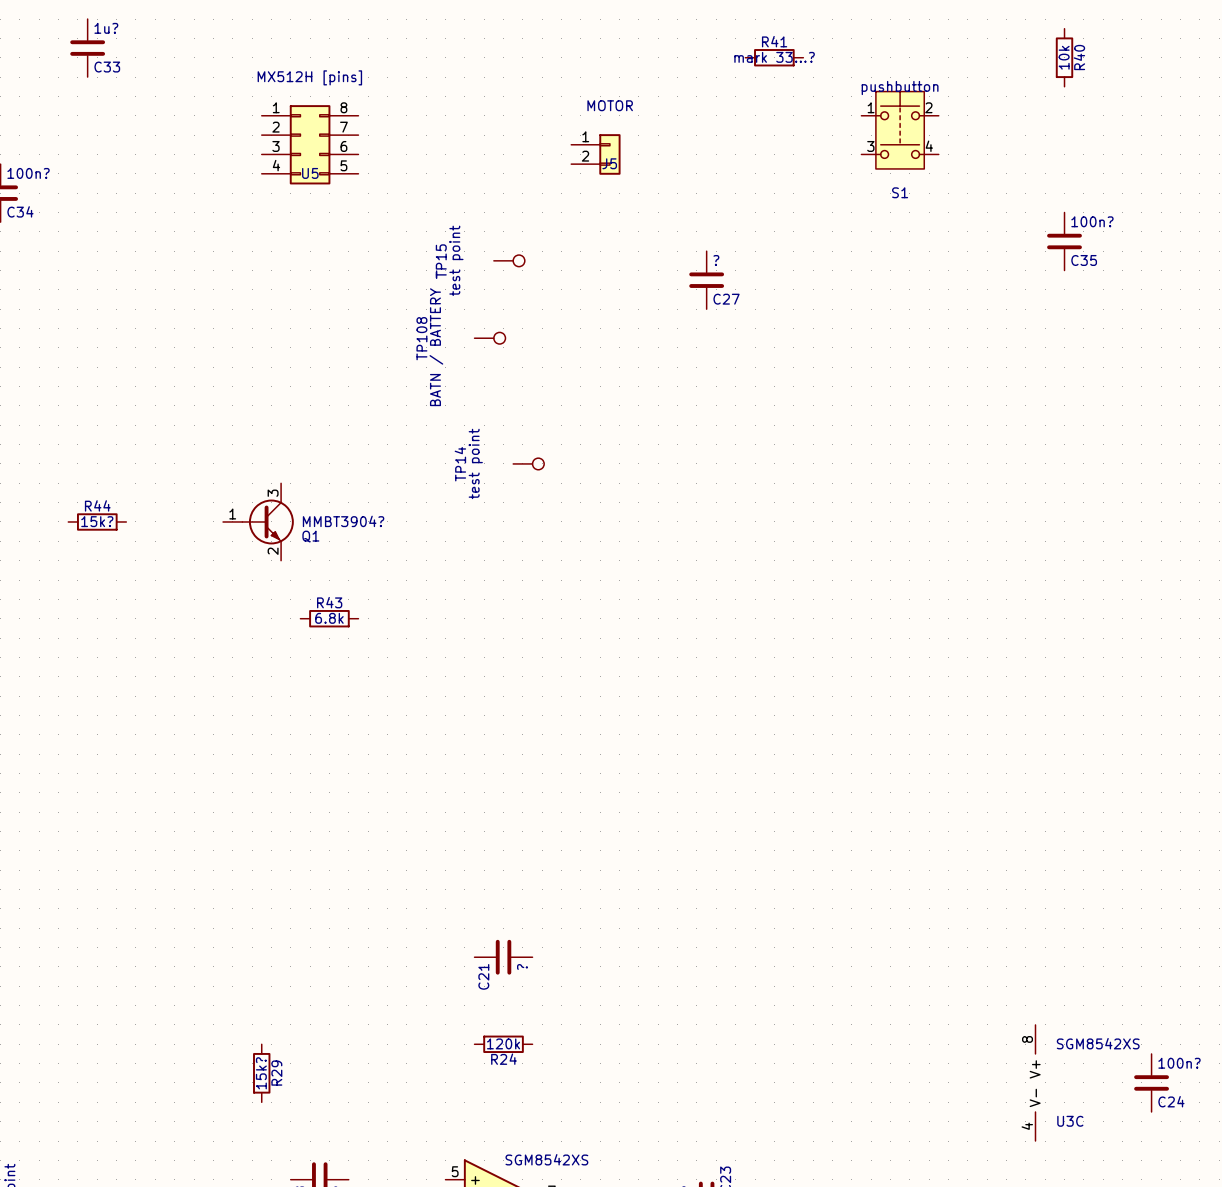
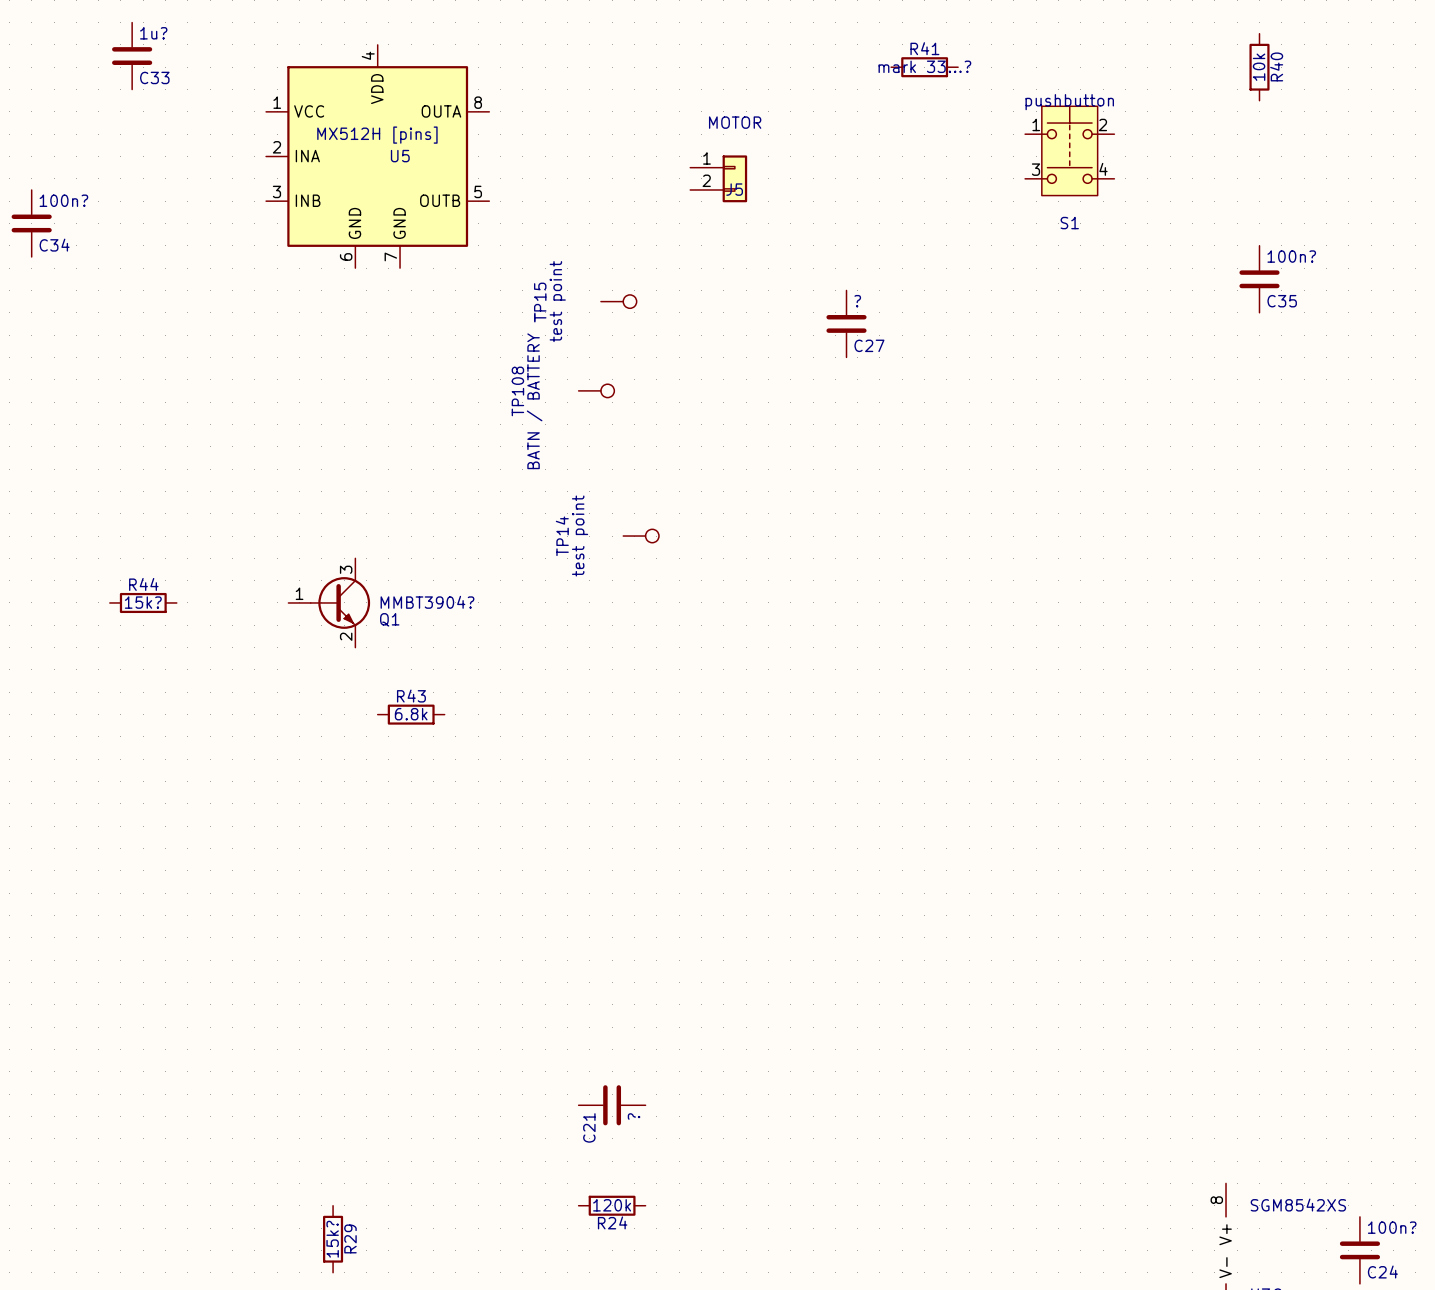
U5 value position: MX512H [pins] (309, 77) -> MX512H [pins] (377, 135)
U5 symbol: [261, 105, 359, 185] -> [266, 44, 490, 269]
U5 name position: U5 (310, 173) -> U5 (400, 156)

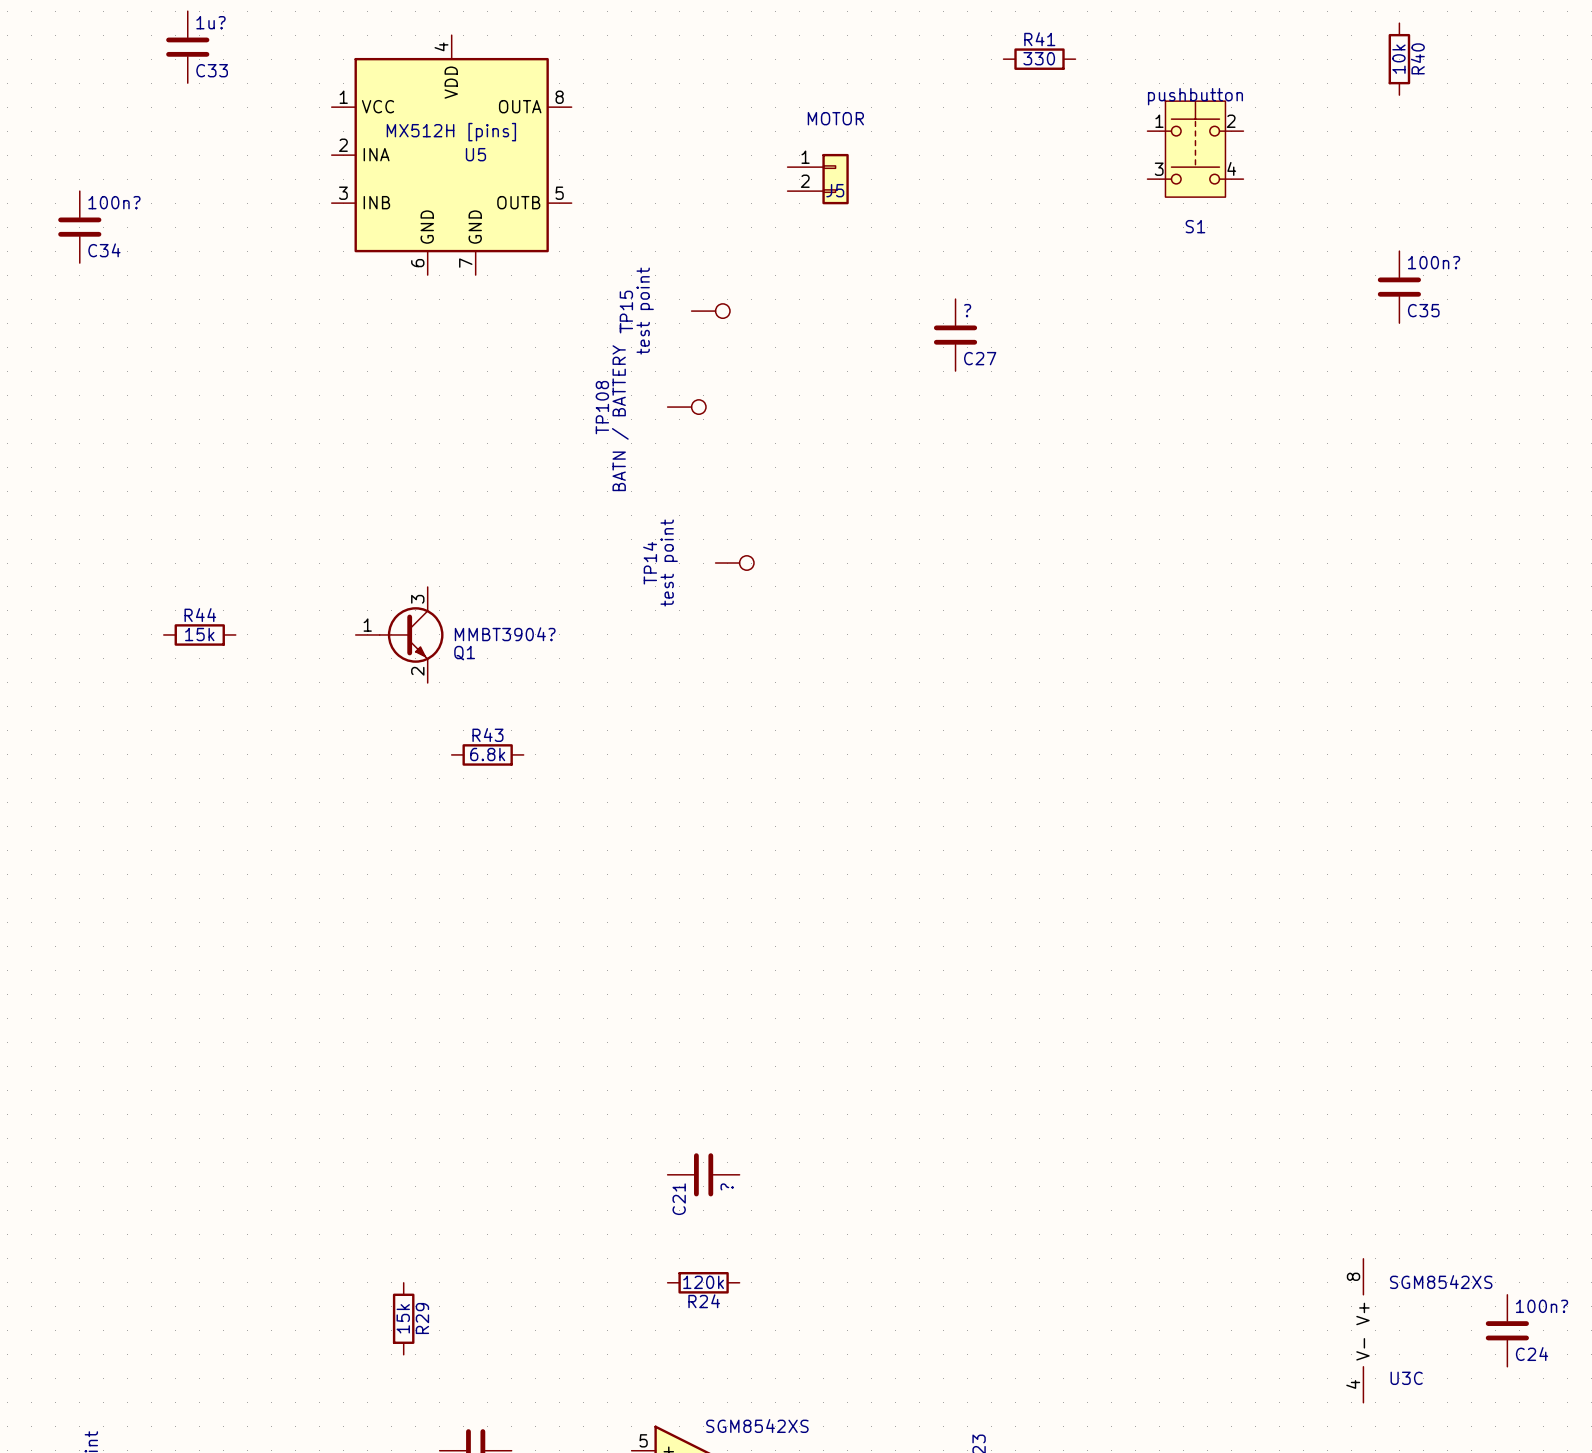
R41 value: mark 33...? (924, 66) -> 330 (1039, 58)
R44 value: 15k? (143, 602) -> 15k (199, 634)
R29 value: 15k? (332, 1239) -> 15k (403, 1318)

